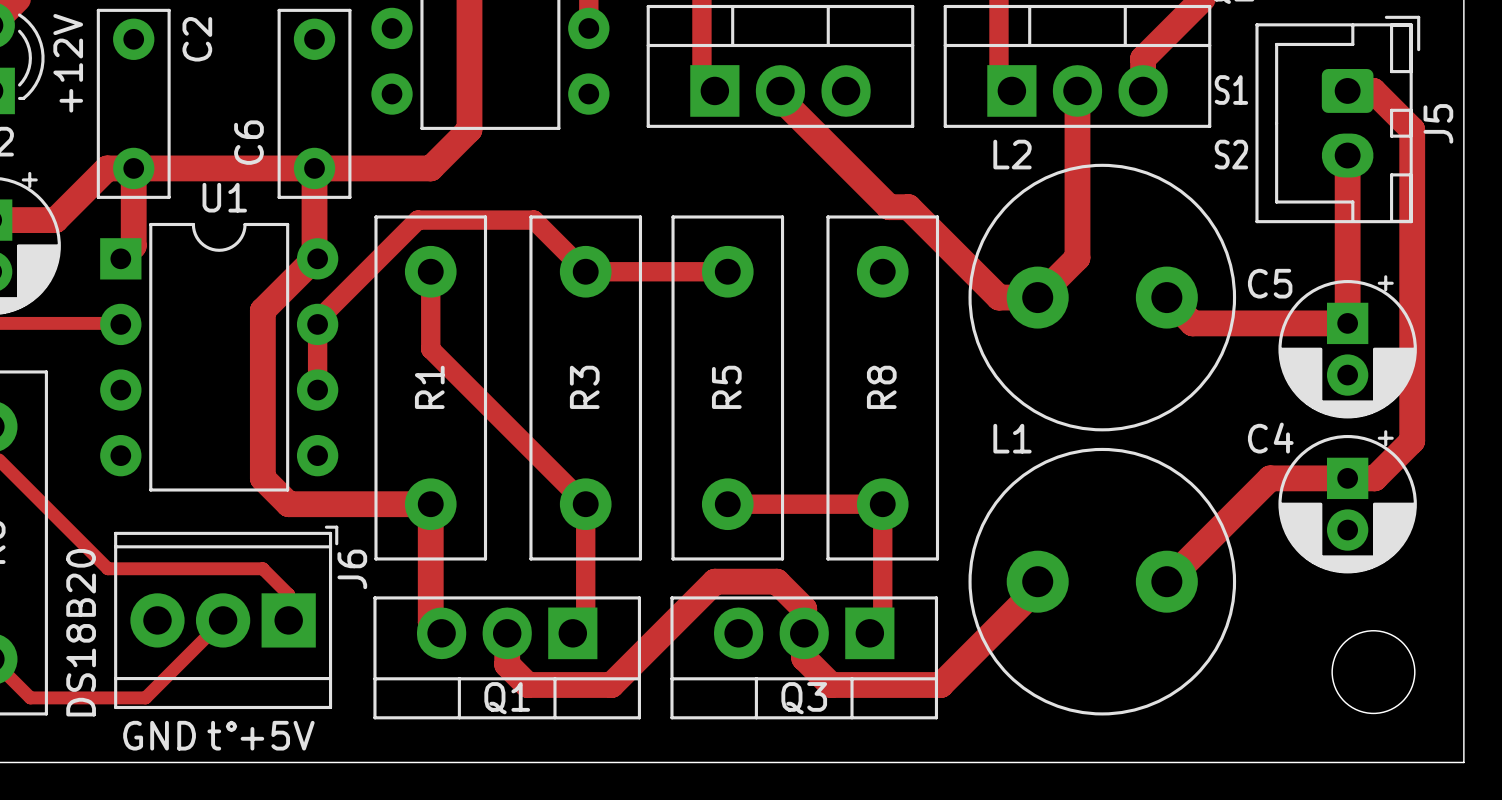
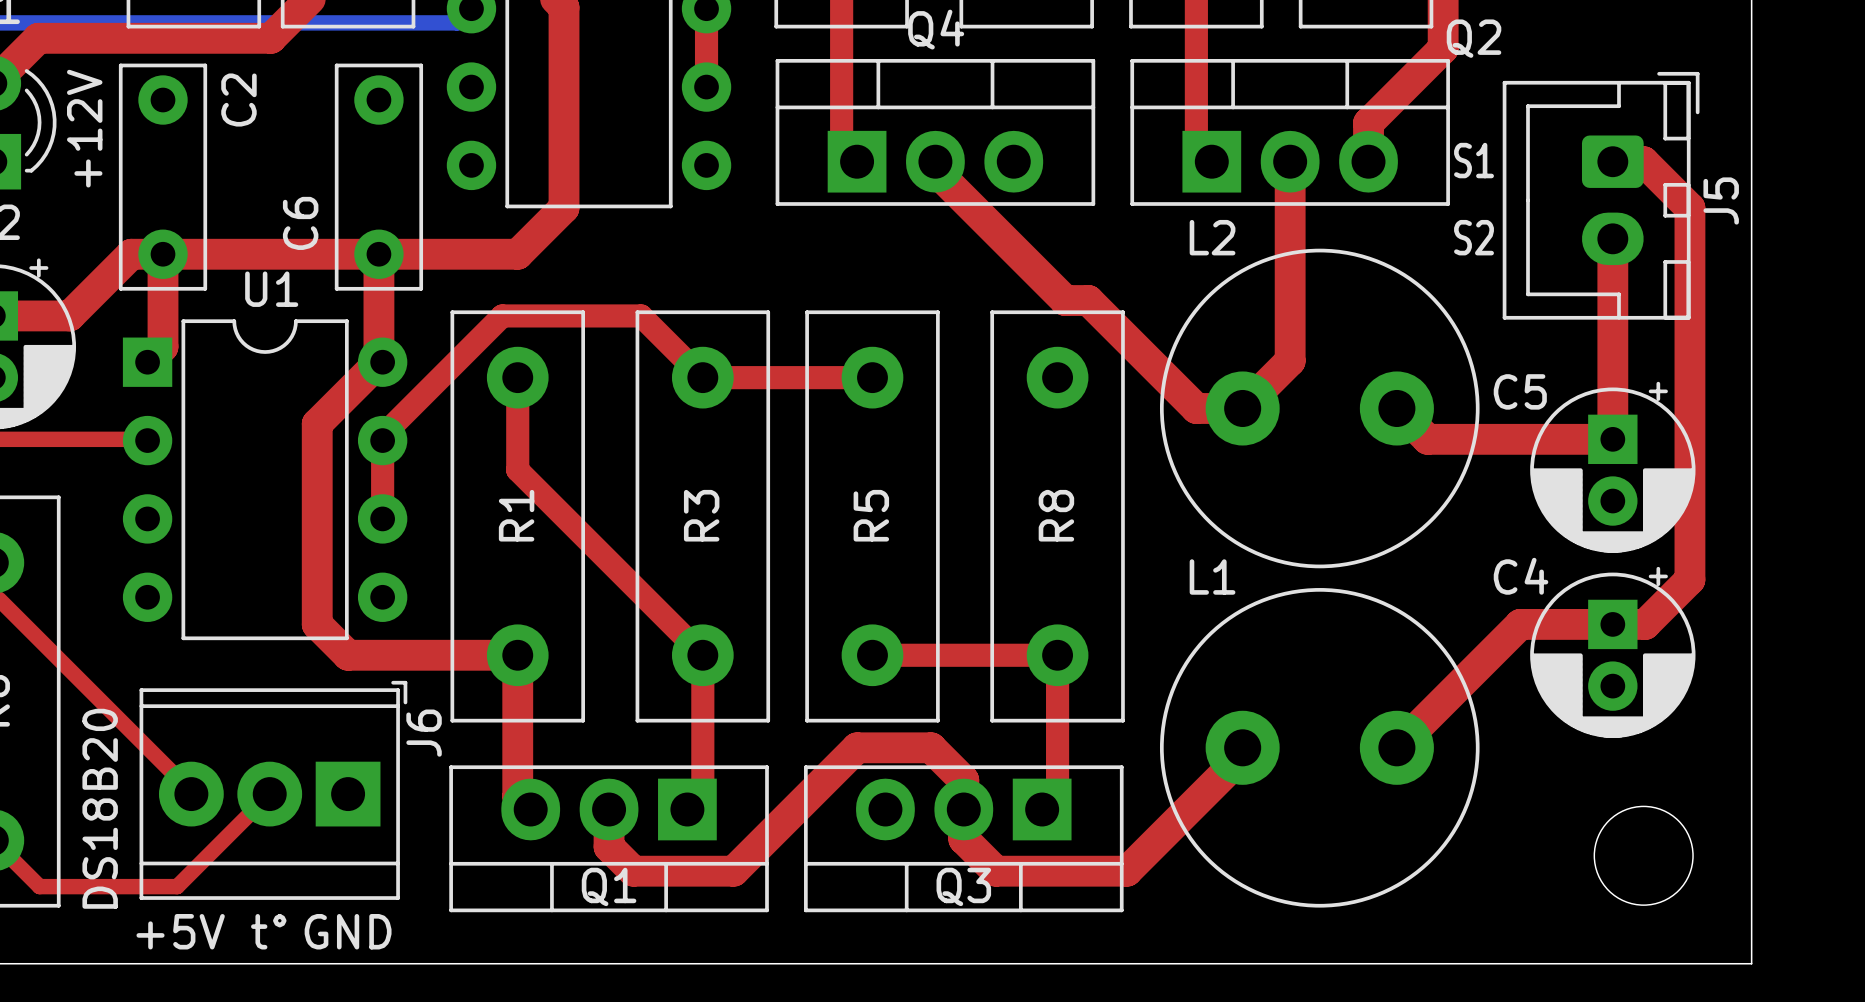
top track: (107, 568) (262, 568) (288, 594) (288, 620) -> (132, 732) (191, 791)
text: GND (159, 735) -> +5V (180, 931)
text: +5V (277, 735) -> GND (348, 931)

